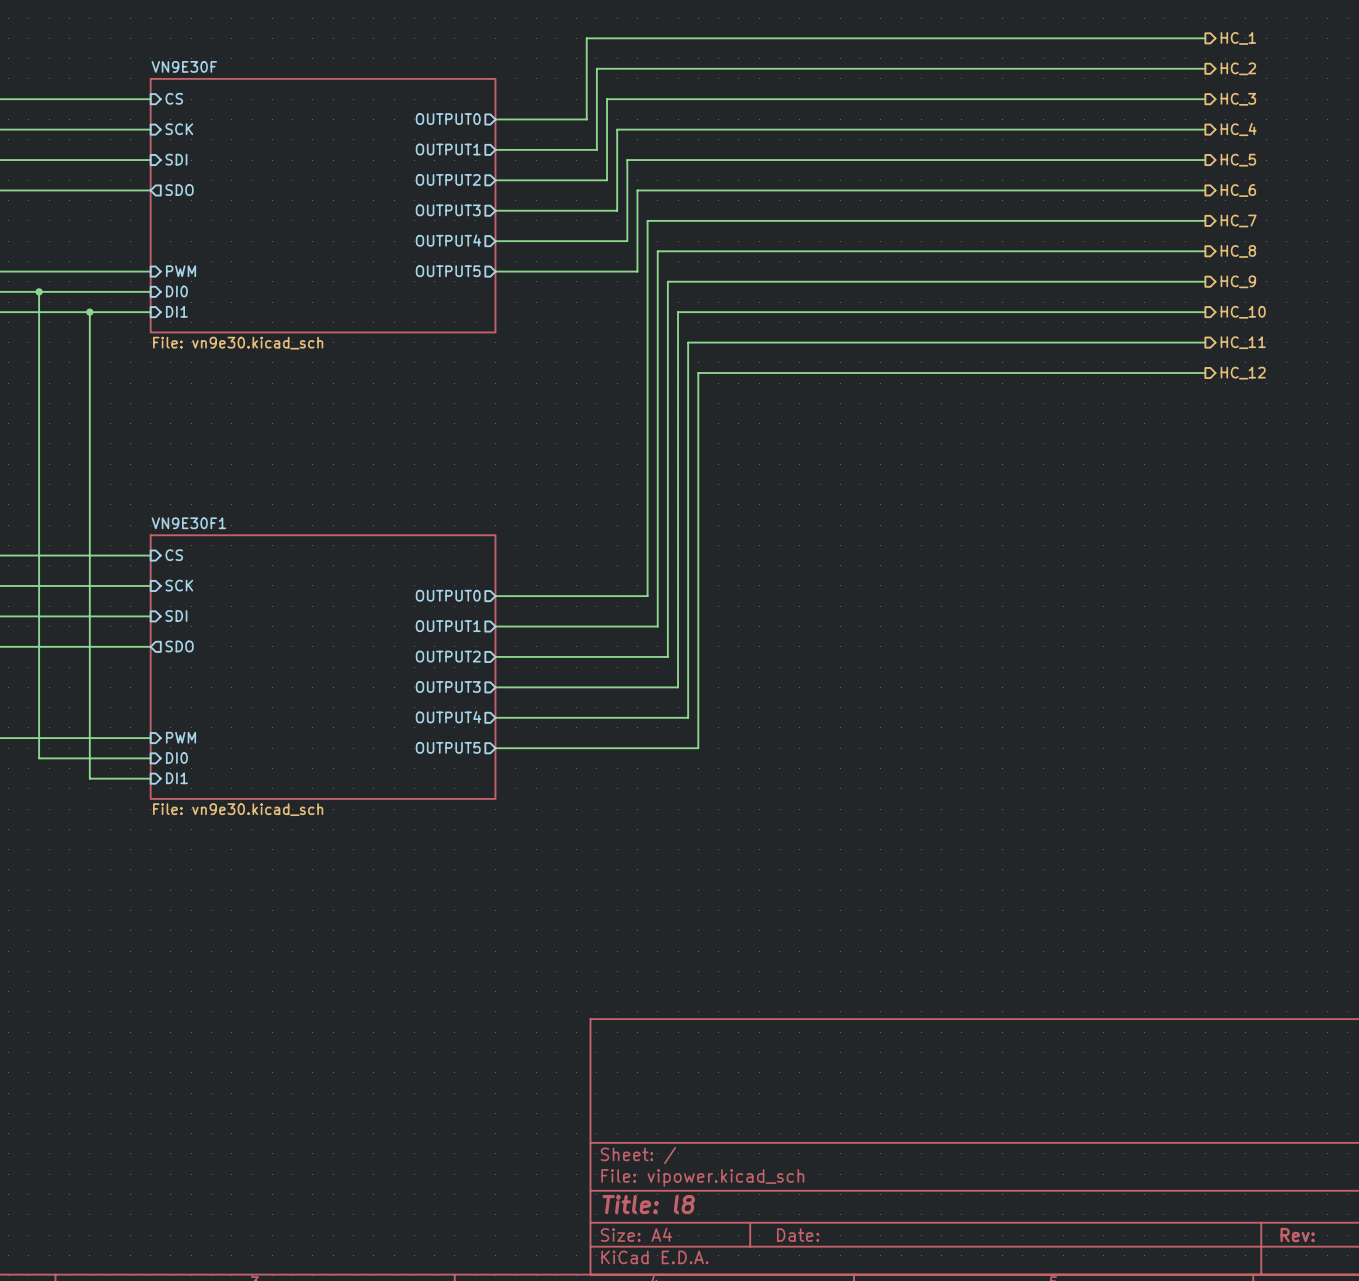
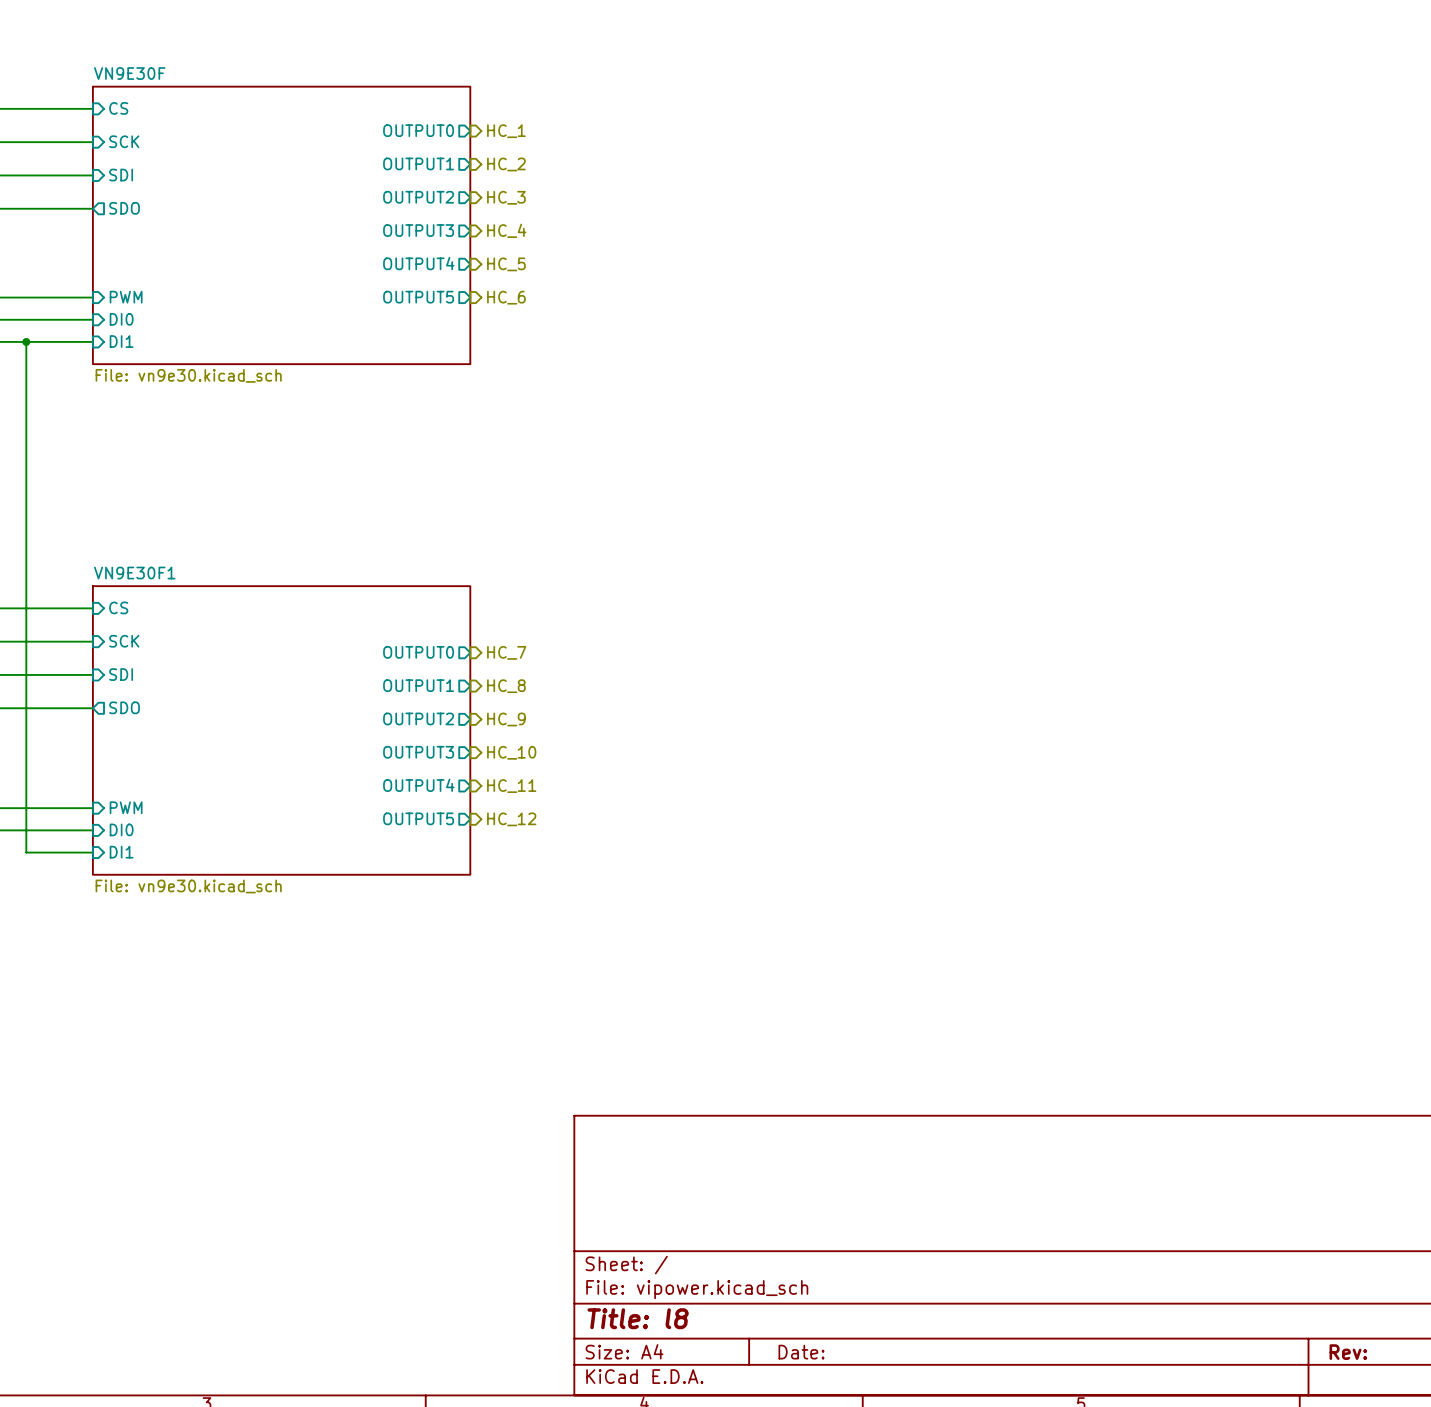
wire: (1205, 38) (586, 38) (586, 119) (495, 119) -> none
hierarchical label: HC_1 (1238, 38) -> none
wire: (1205, 68) (596, 68) (596, 149) (495, 149) -> none
hierarchical label: HC_2 (1238, 68) -> none
wire: (1205, 99) (607, 99) (607, 180) (495, 180) -> none
hierarchical label: HC_3 (1238, 99) -> none
hierarchical label: none -> HC_1 (506, 131)
wire: (1205, 129) (617, 129) (617, 210) (495, 210) -> none
hierarchical label: HC_4 (1238, 129) -> none
hierarchical label: none -> HC_2 (506, 164)
wire: (1205, 160) (627, 160) (627, 241) (495, 241) -> none
hierarchical label: HC_5 (1238, 160) -> none
hierarchical label: none -> HC_3 (506, 197)
wire: (1205, 190) (637, 190) (637, 271) (495, 271) -> none
hierarchical label: HC_6 (1238, 190) -> none
hierarchical label: none -> HC_4 (506, 230)
wire: (1205, 220) (647, 220) (647, 596) (495, 596) -> none
hierarchical label: HC_7 (1238, 220) -> none
hierarchical label: none -> HC_5 (506, 264)
wire: (1205, 251) (657, 251) (657, 626) (495, 626) -> none
hierarchical label: HC_8 (1238, 251) -> none
hierarchical label: none -> HC_6 (506, 297)
wire: (1205, 281) (667, 281) (667, 656) (495, 656) -> none
hierarchical label: HC_9 (1238, 281) -> none
wire: (1205, 312) (678, 312) (678, 687) (495, 687) -> none
hierarchical label: HC_10 (1243, 312) -> none
wire: (1205, 342) (688, 342) (688, 717) (495, 717) -> none
hierarchical label: HC_11 (1243, 342) -> none
wire: (1205, 373) (698, 373) (698, 748) (495, 748) -> none
hierarchical label: HC_12 (1243, 373) -> none
hierarchical label: none -> HC_7 (506, 652)
hierarchical label: none -> HC_8 (506, 686)
hierarchical label: none -> HC_9 (506, 719)
hierarchical label: none -> HC_10 (511, 752)
hierarchical label: none -> HC_11 (511, 786)
hierarchical label: none -> HC_12 (511, 819)

